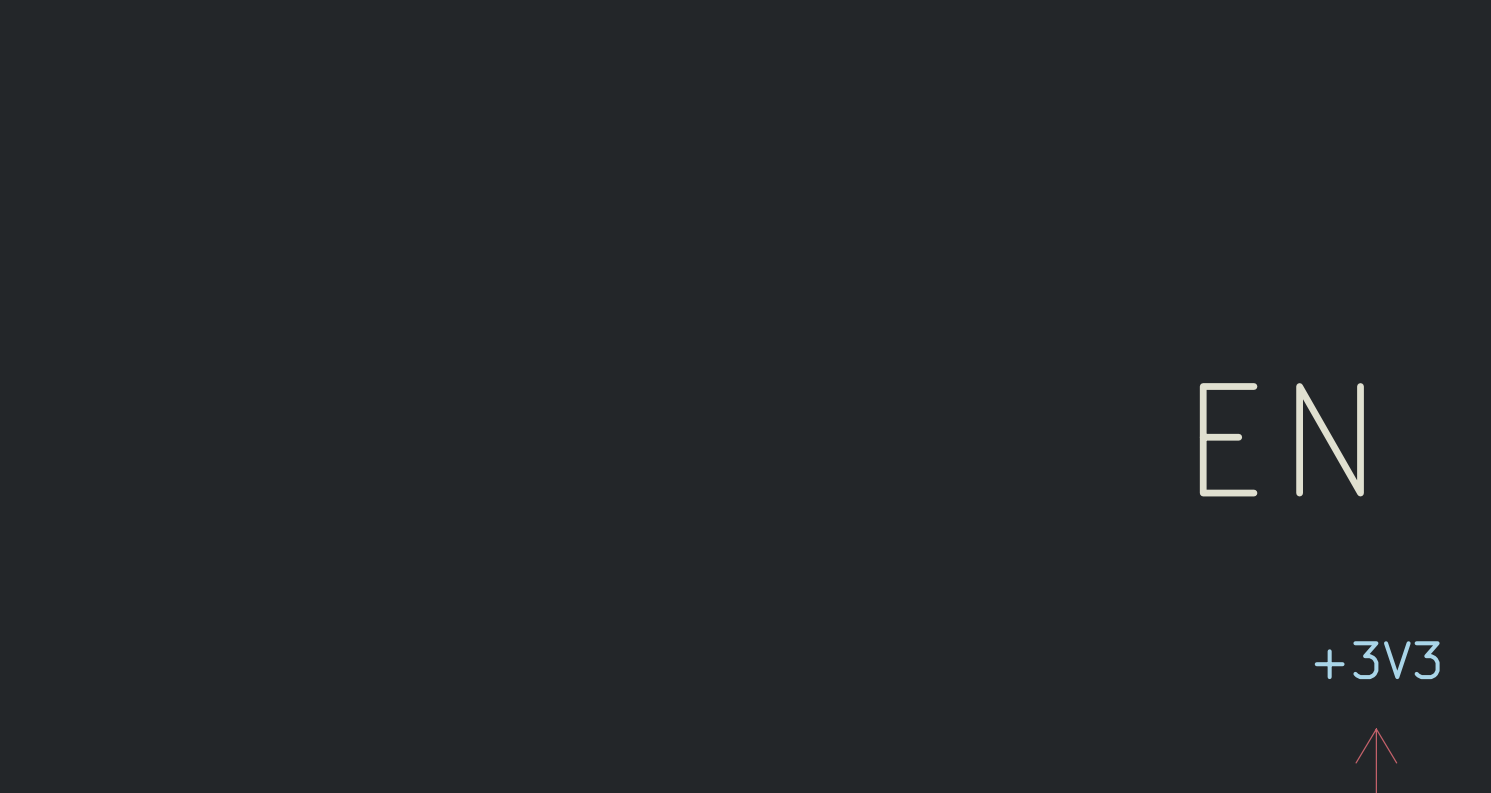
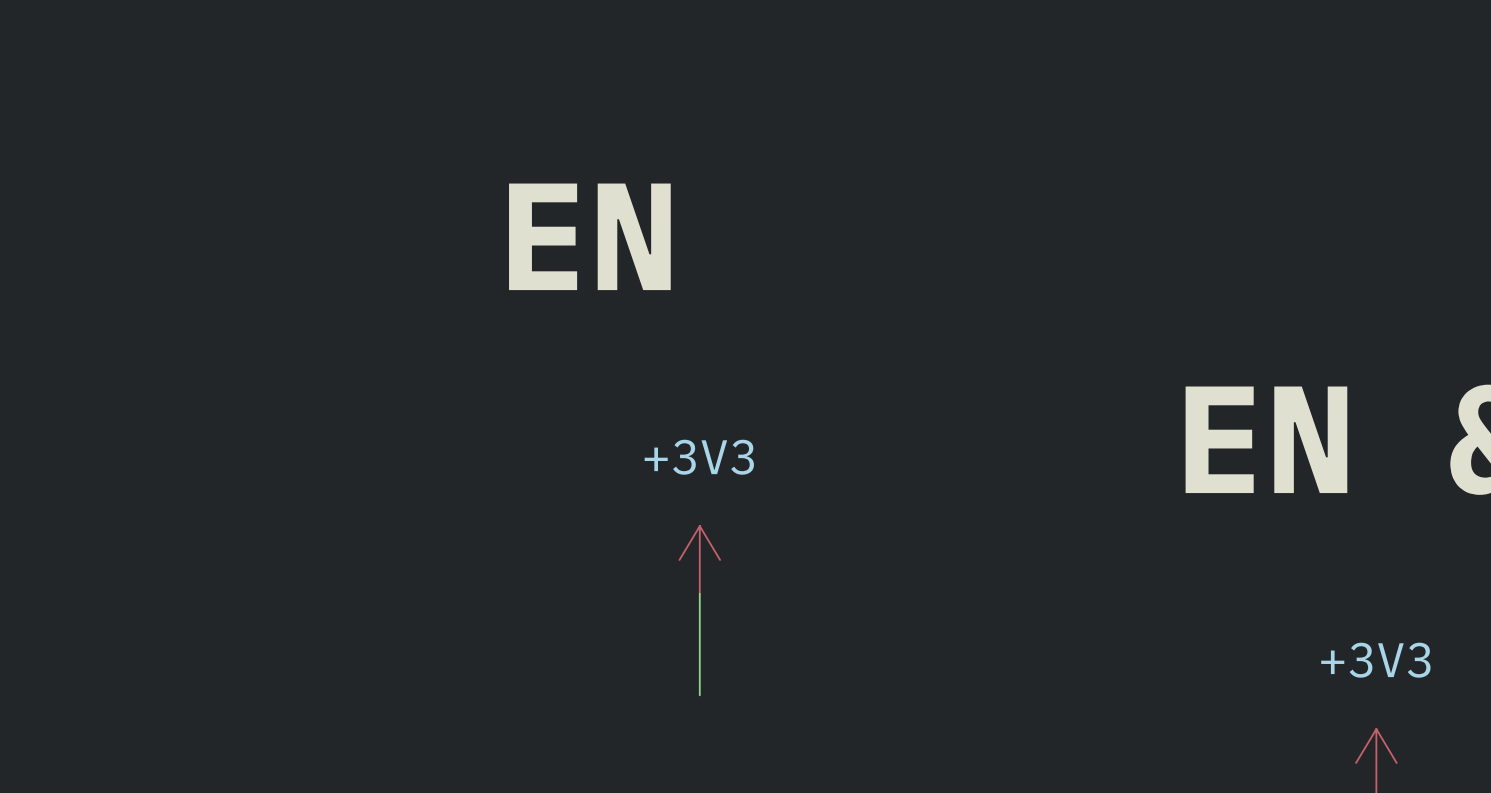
label: none -> EN (589, 236)
power symbol: none -> +3V3 (699, 559)
wire: none -> (699, 593) (699, 695)

